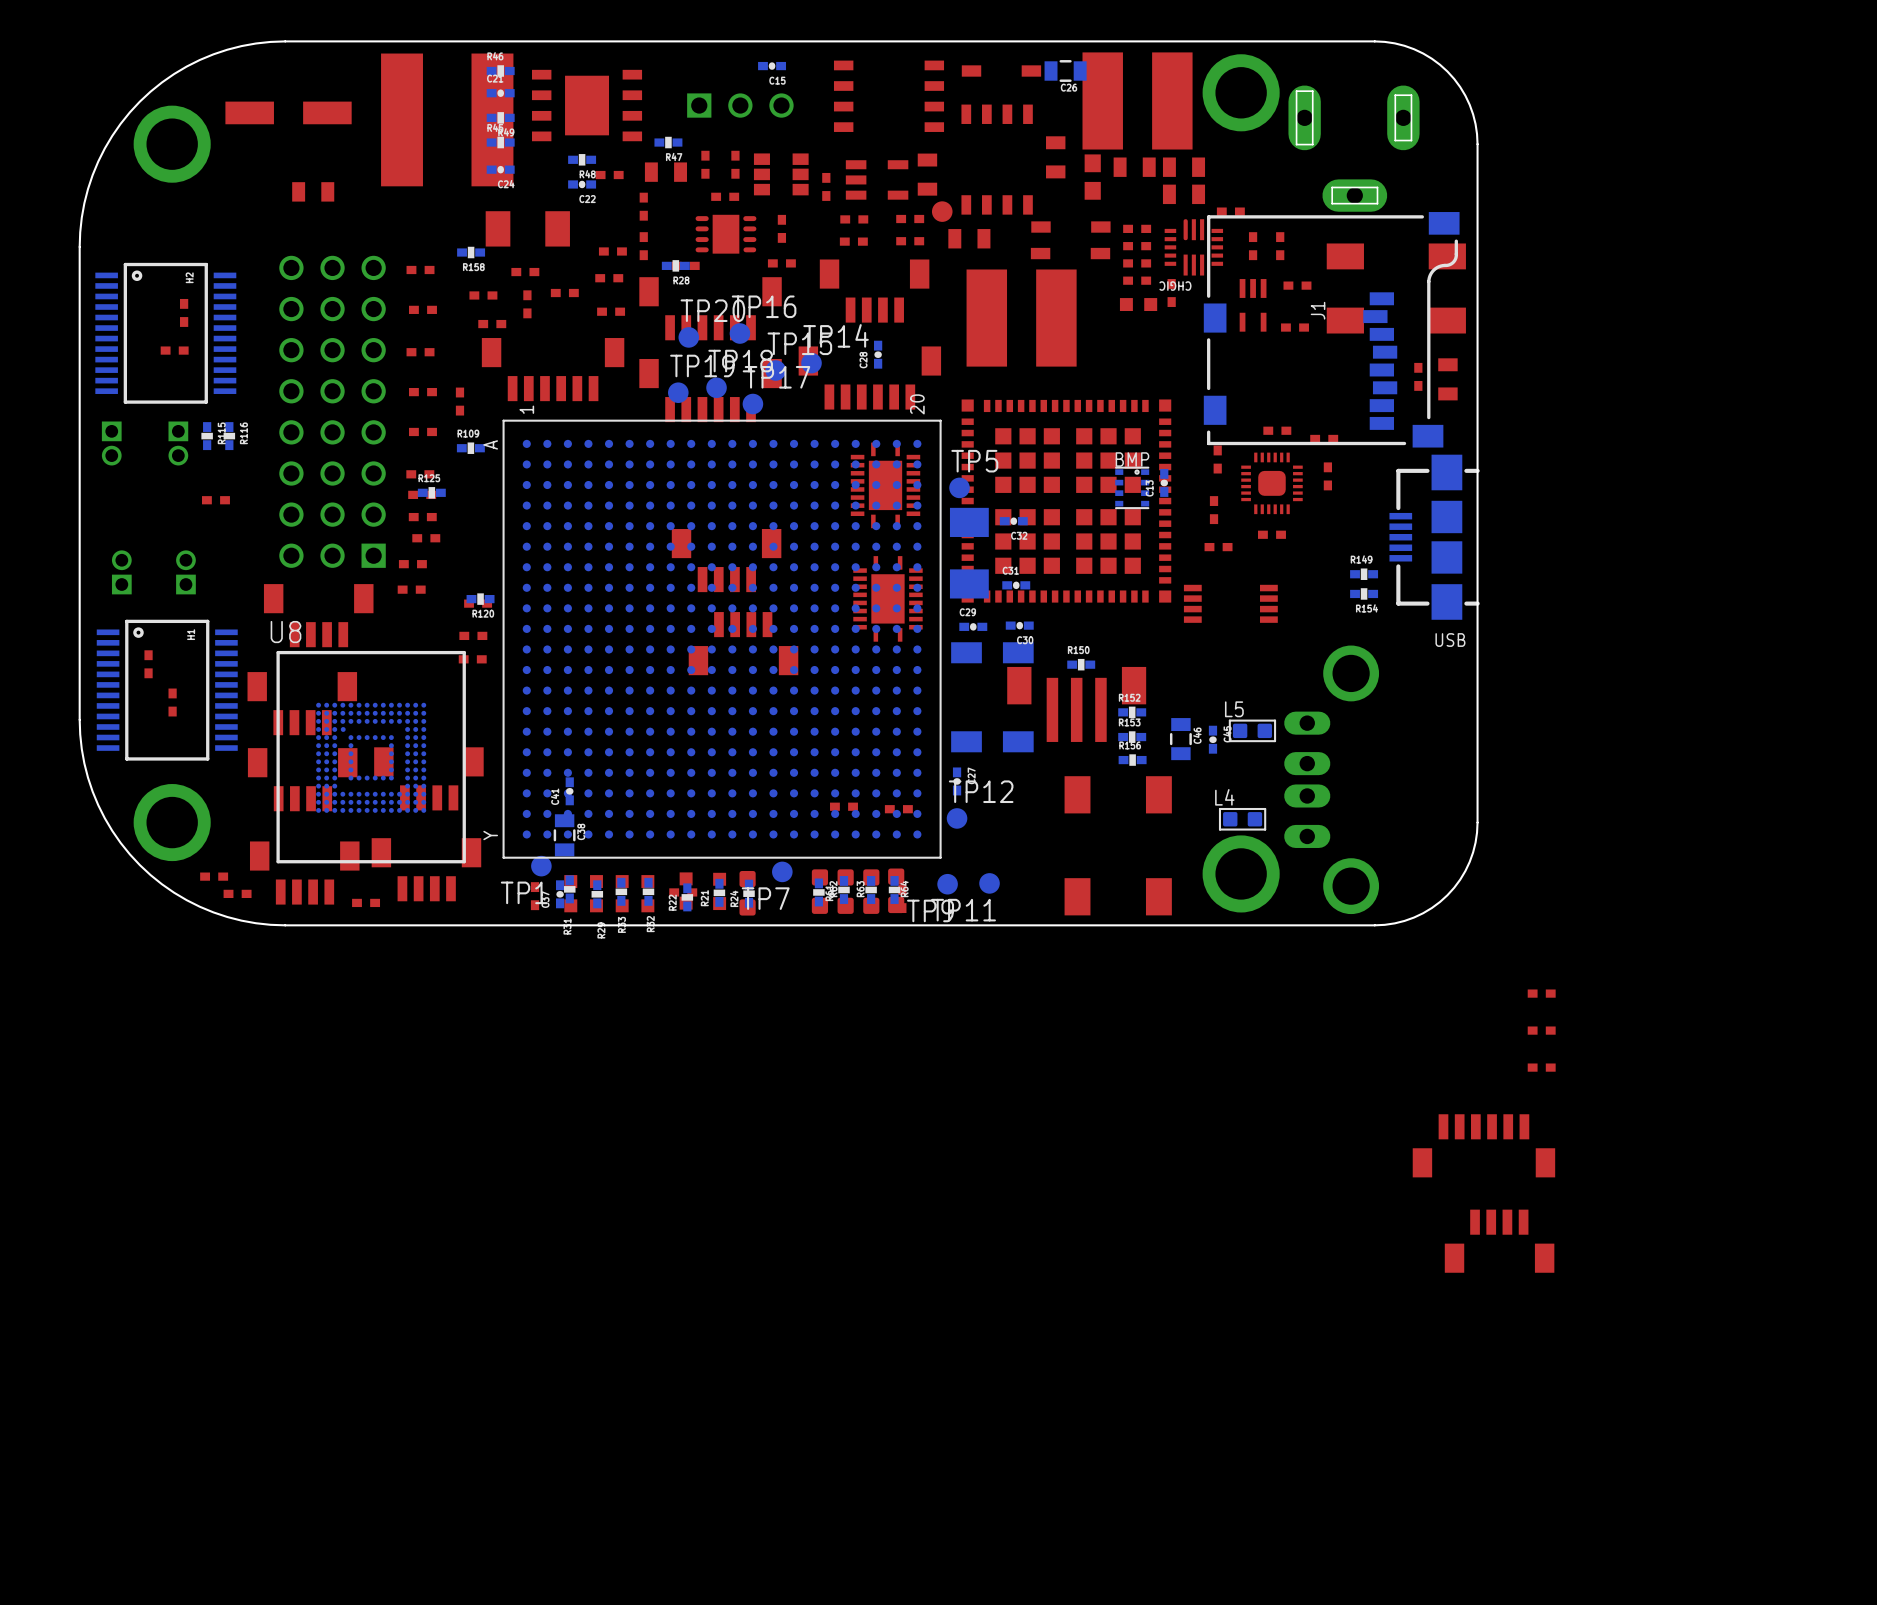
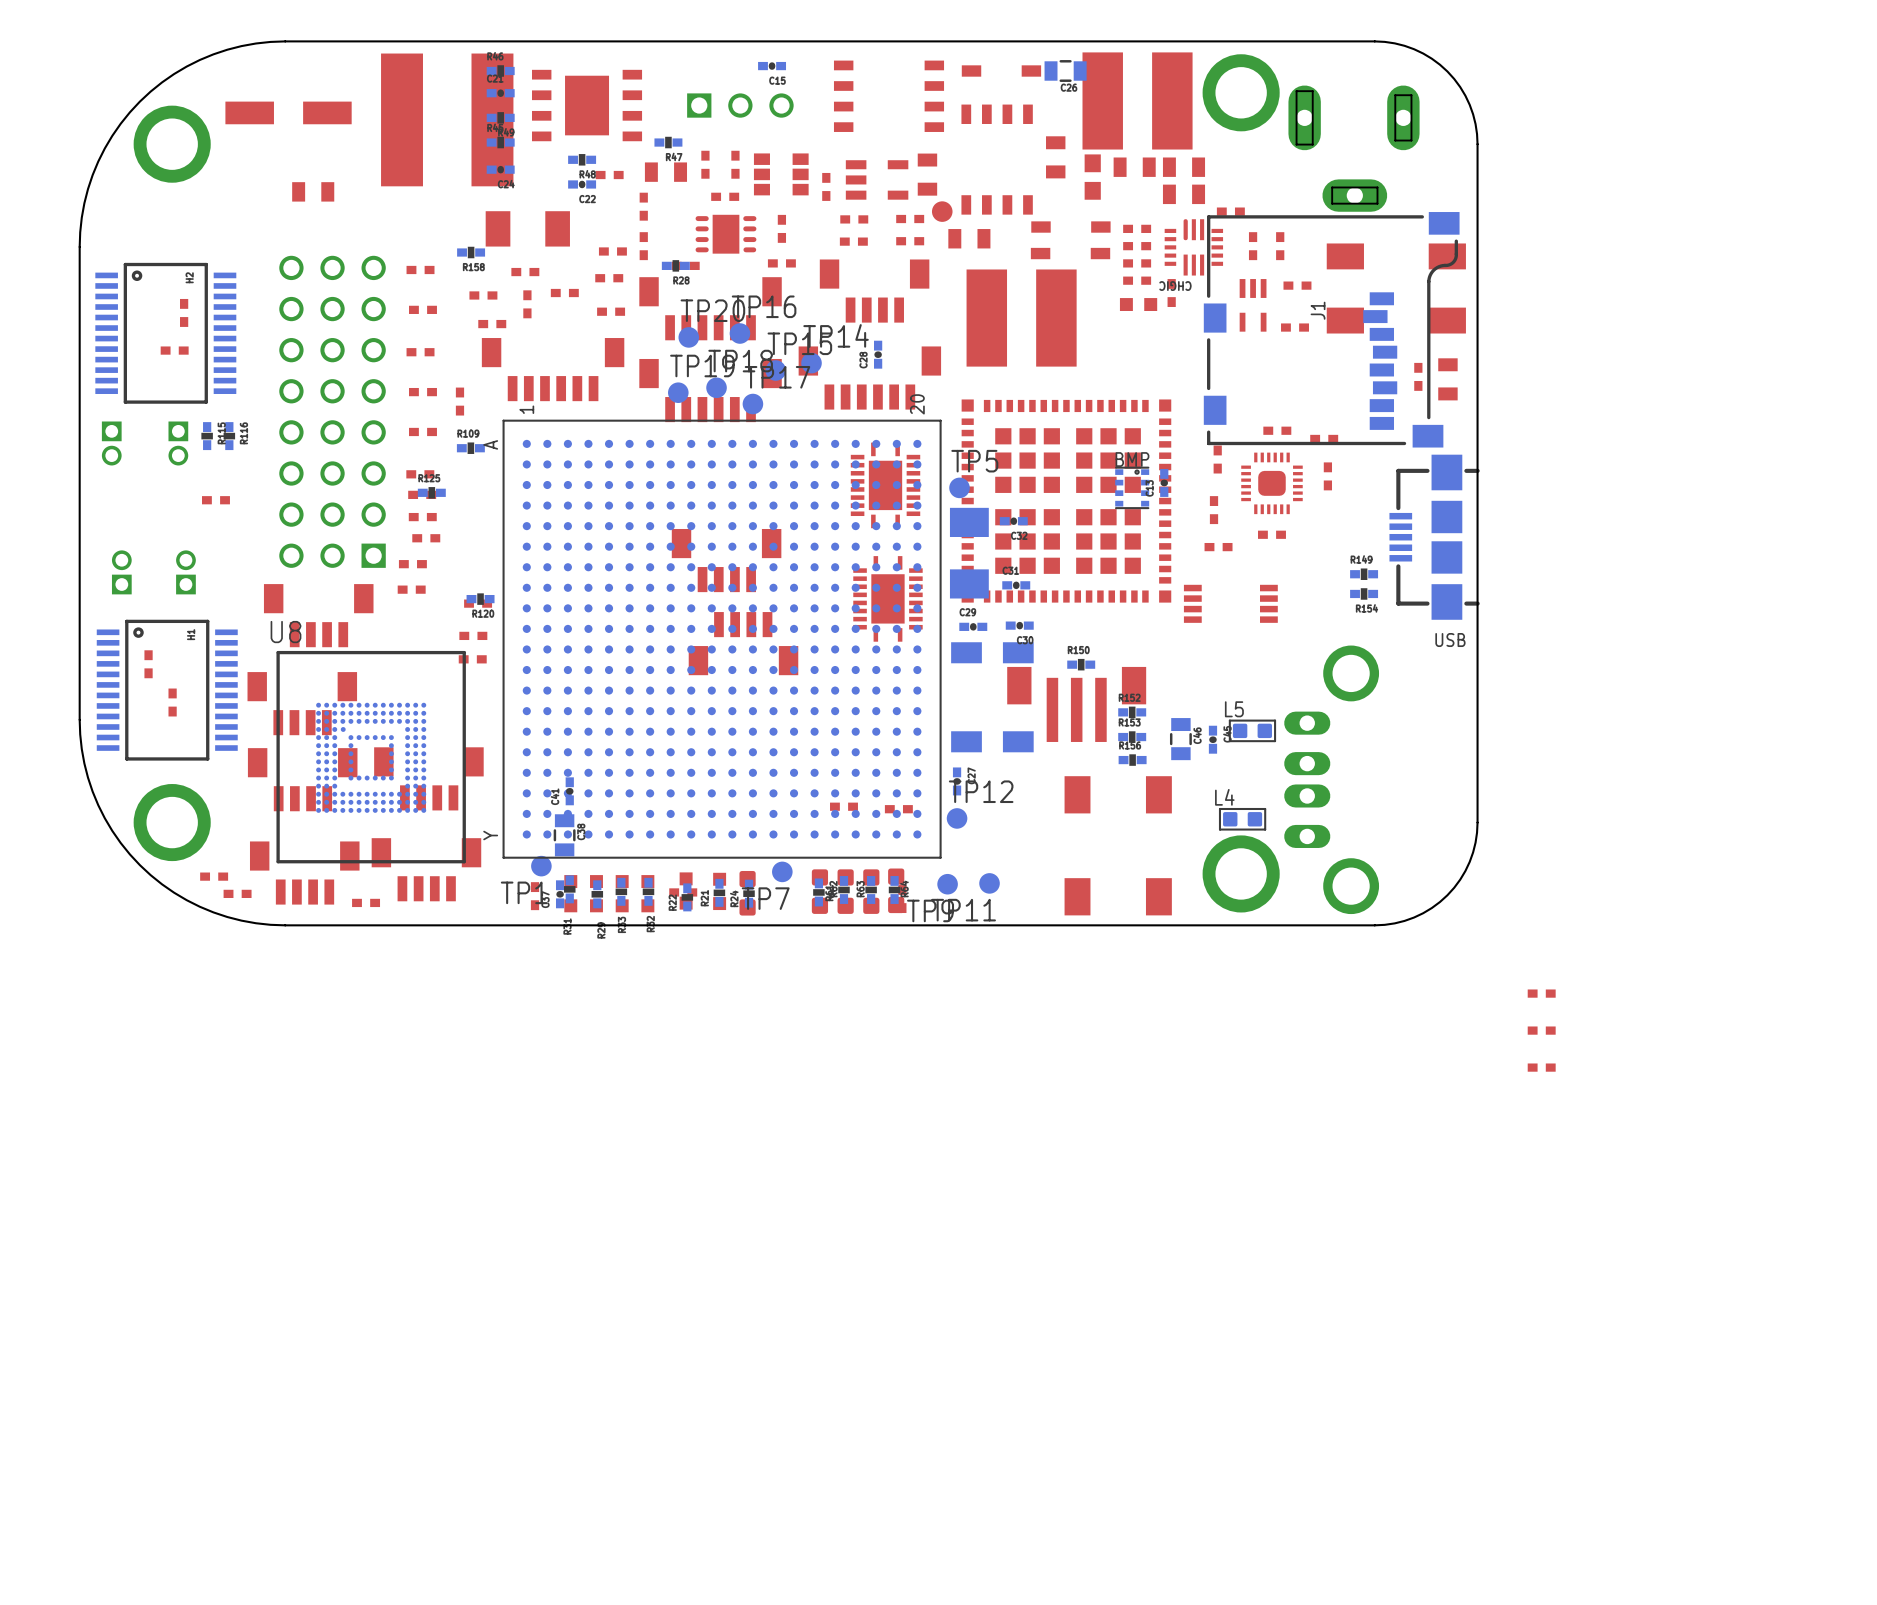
part: (1483, 1145) -> none
part: (1499, 1241) -> none

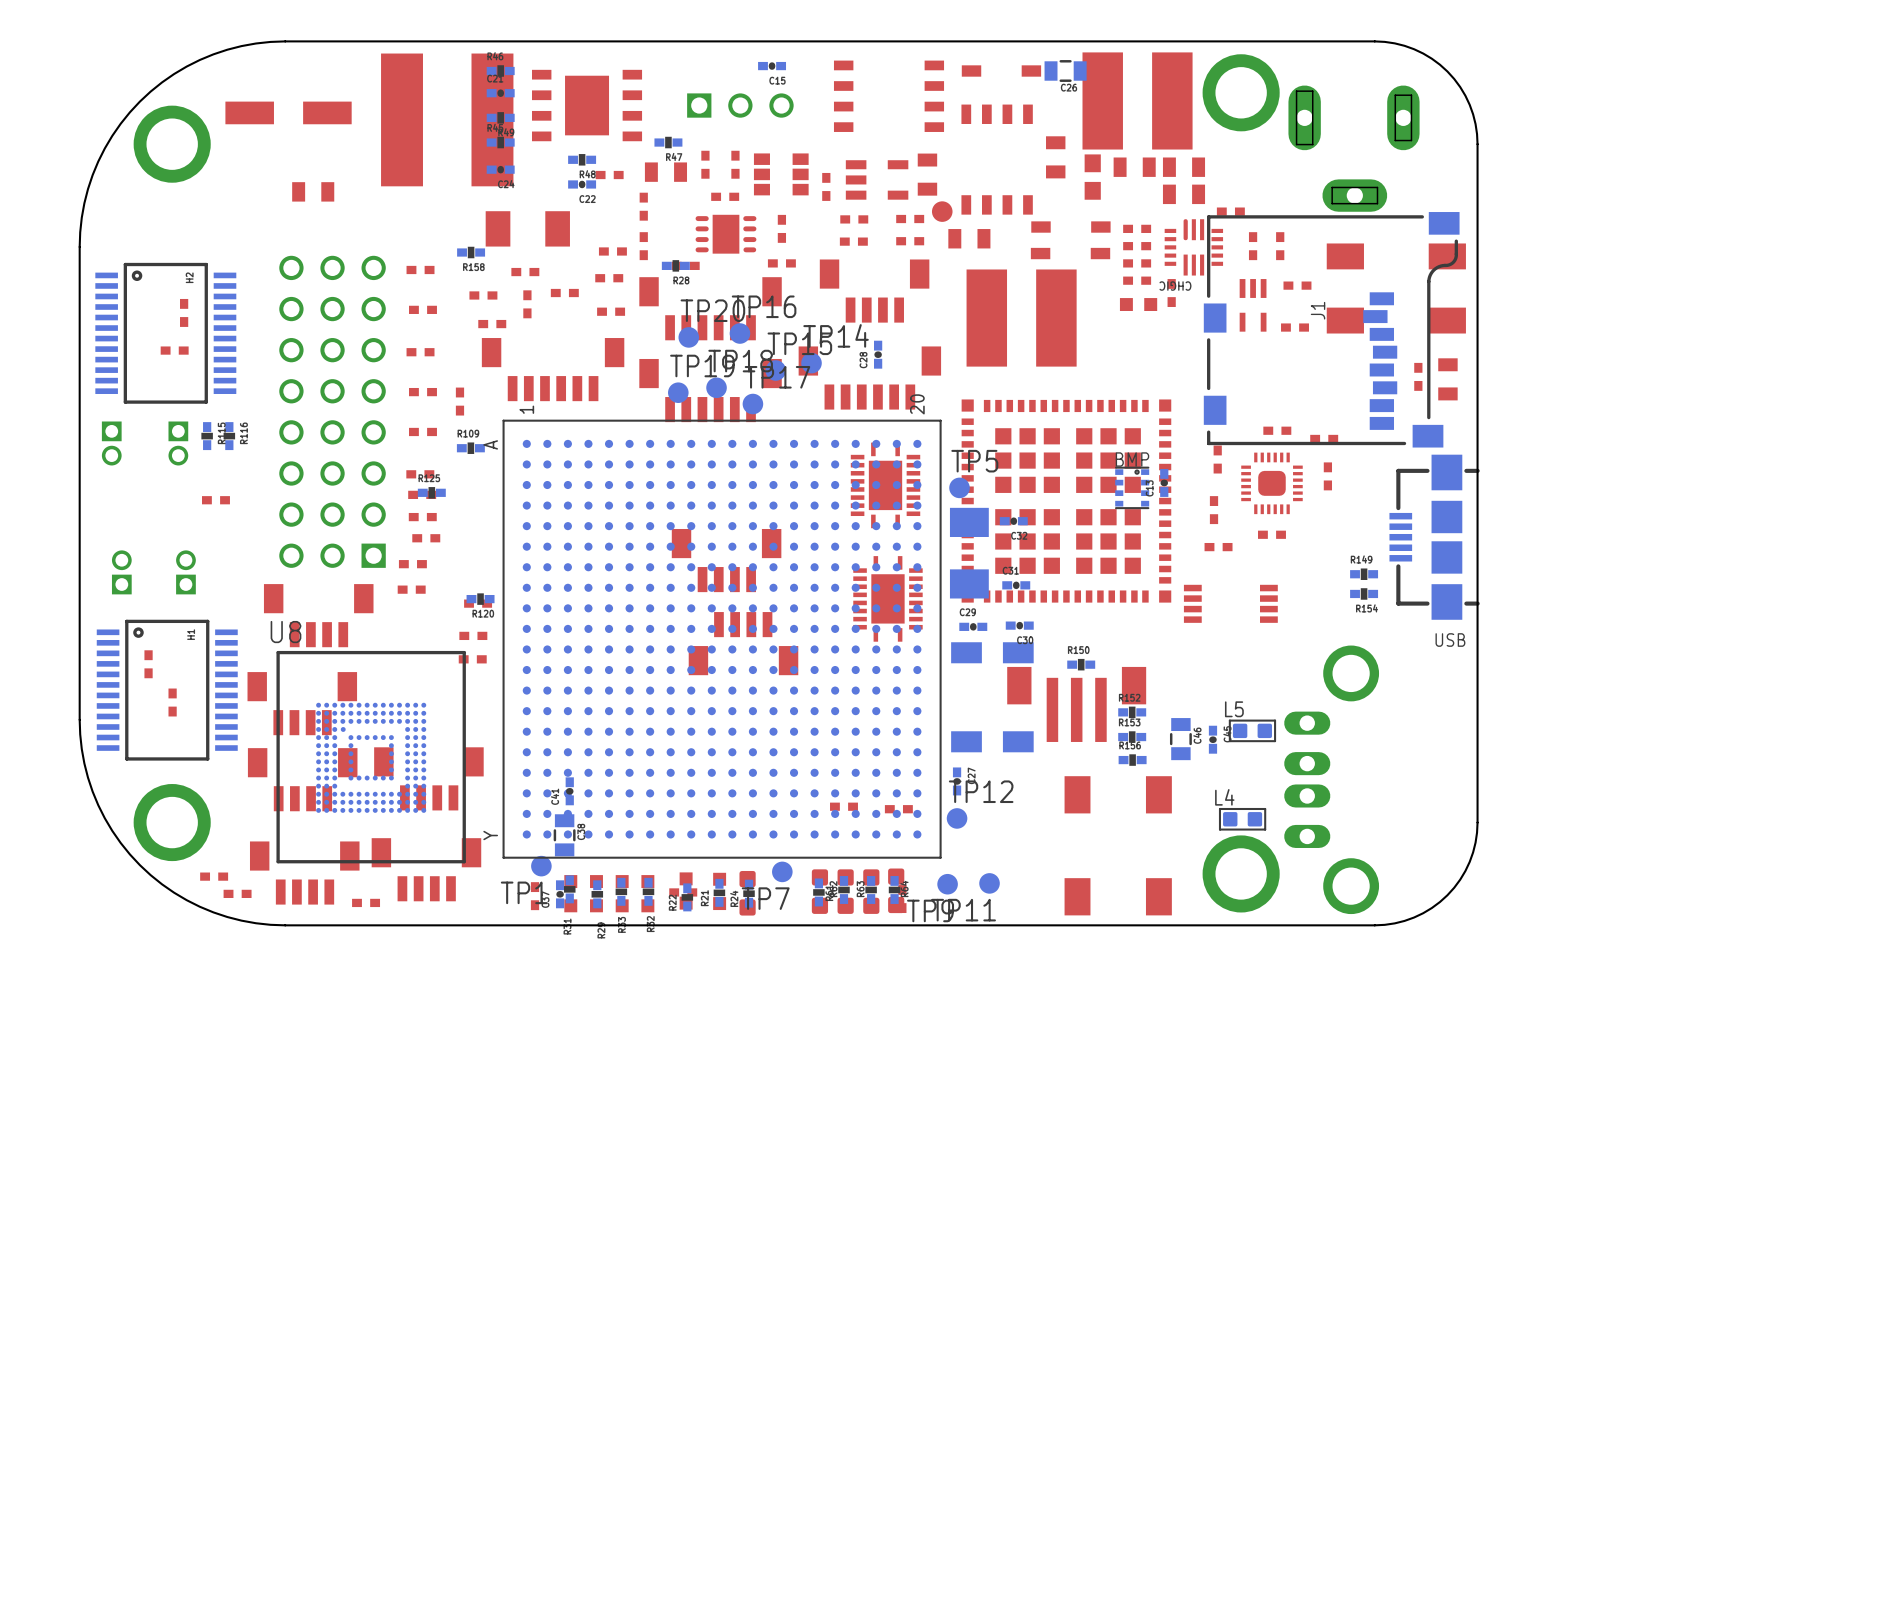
part: (1541, 993) -> none
part: (1541, 1030) -> none
part: (1541, 1067) -> none

